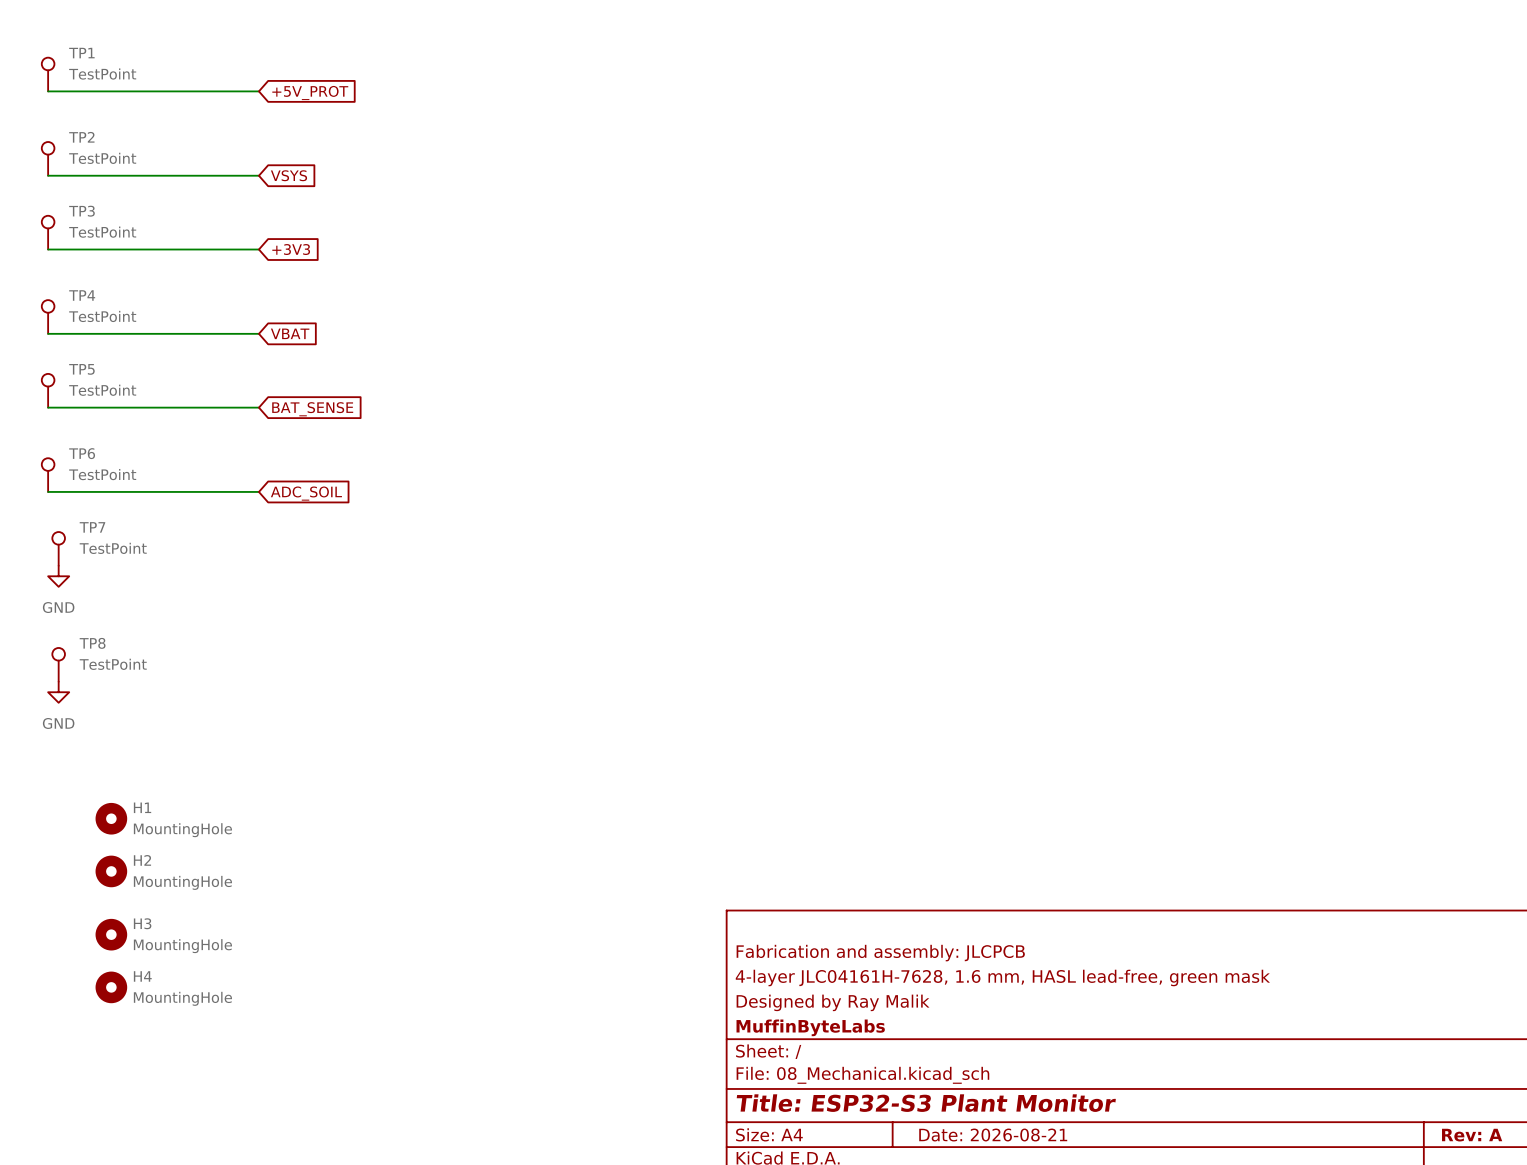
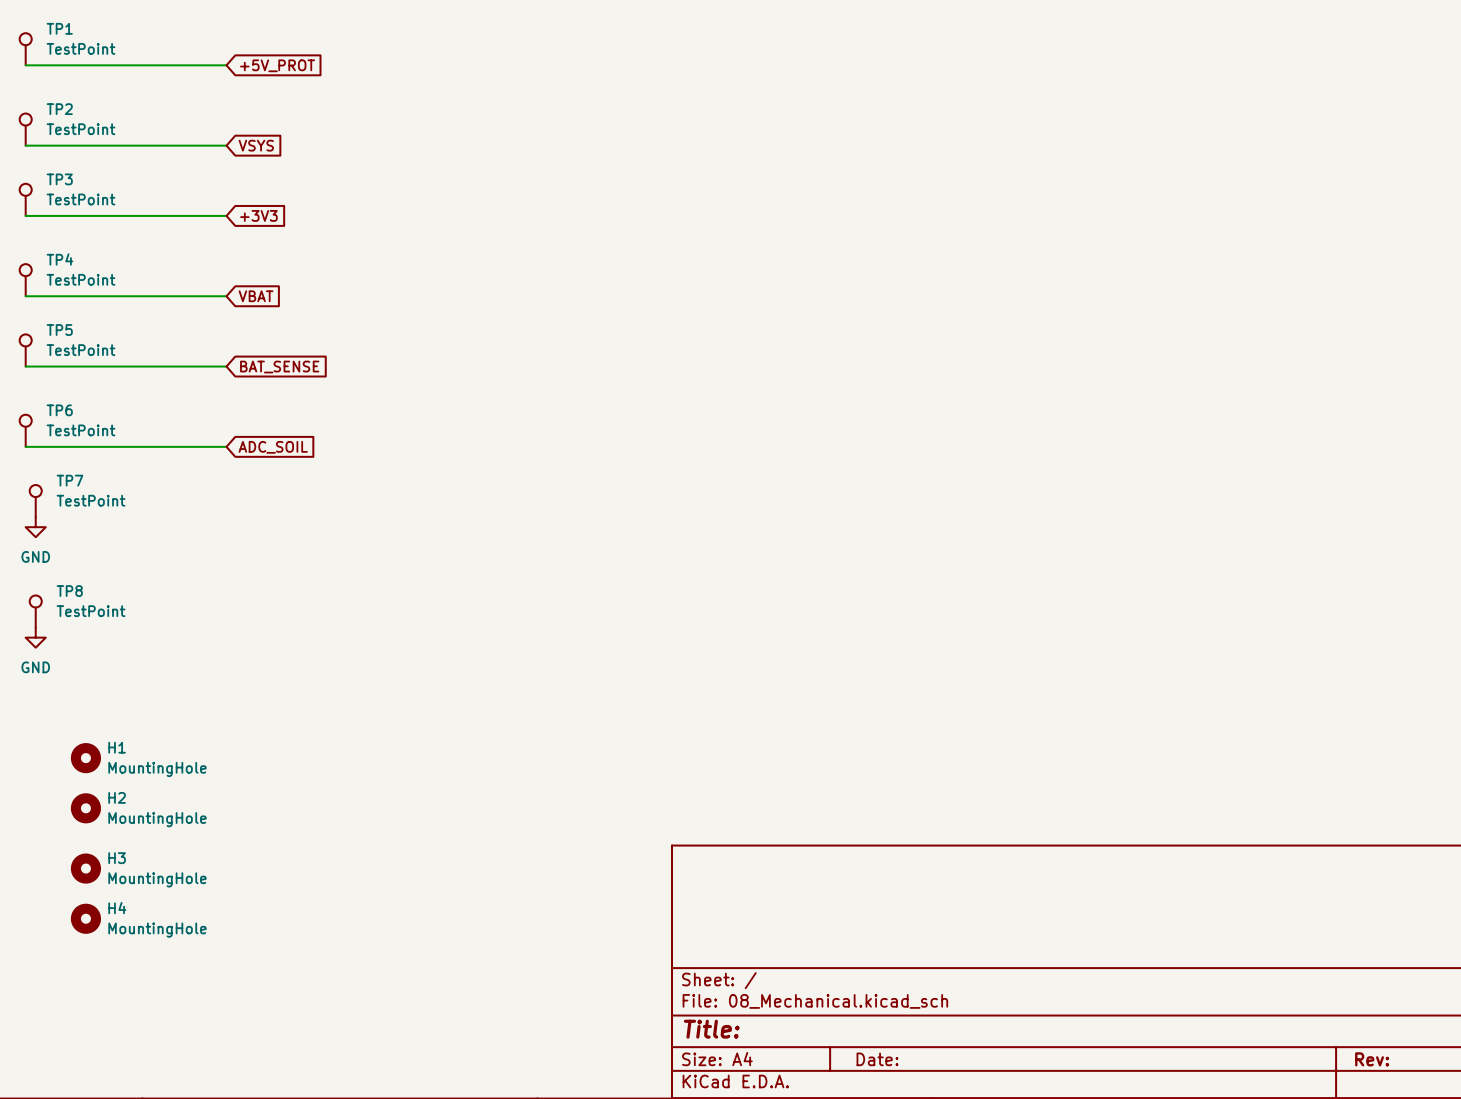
title block: Fabrication and assembly: JLCPCB (880, 953) -> none
title block: 4-layer JLC04161H-7628, 1.6 mm, HASL lead-free, green mask (1002, 977) -> none
title block: Designed by Ray Malik (833, 1002) -> none
title block: MuffinByteLabs (810, 1027) -> none
title block: Title: ESP32-S3 Plant Monitor (926, 1103) -> Title: (711, 1029)
title block: Date: 2026-08-21 (993, 1135) -> Date: (877, 1059)
title block: Rev: A (1472, 1135) -> Rev: (1372, 1059)

